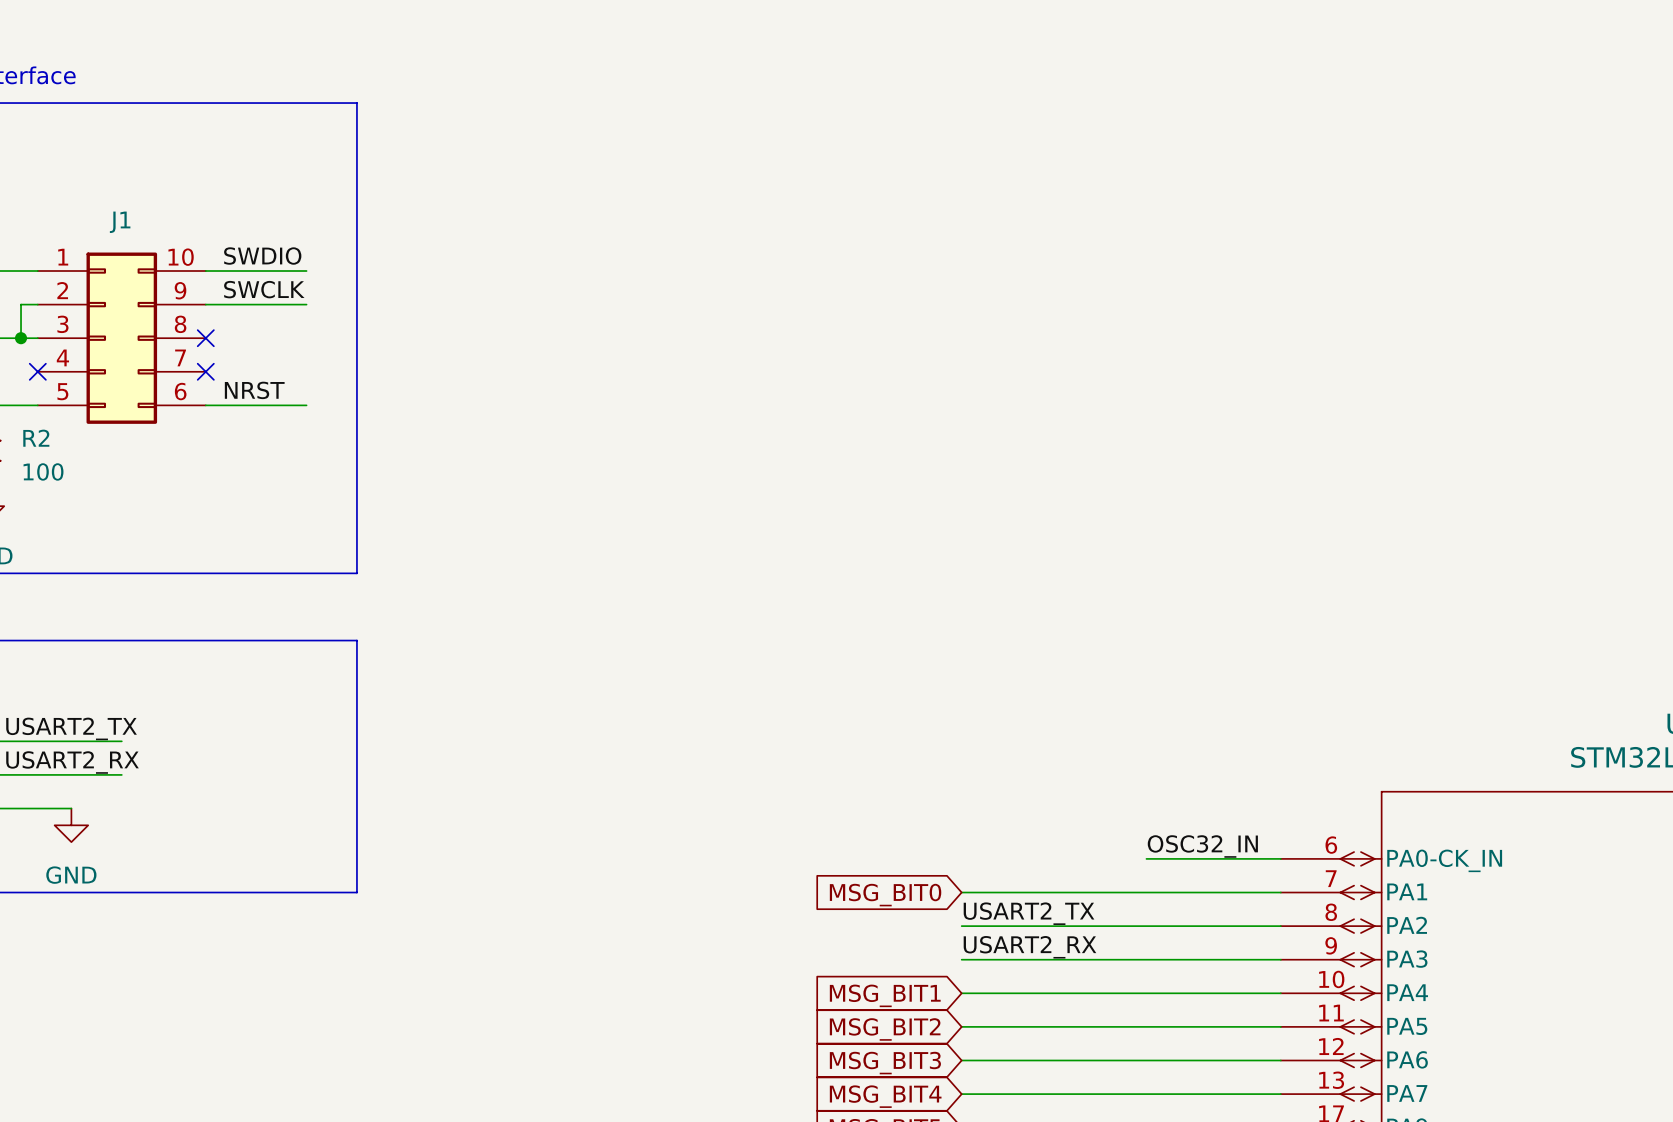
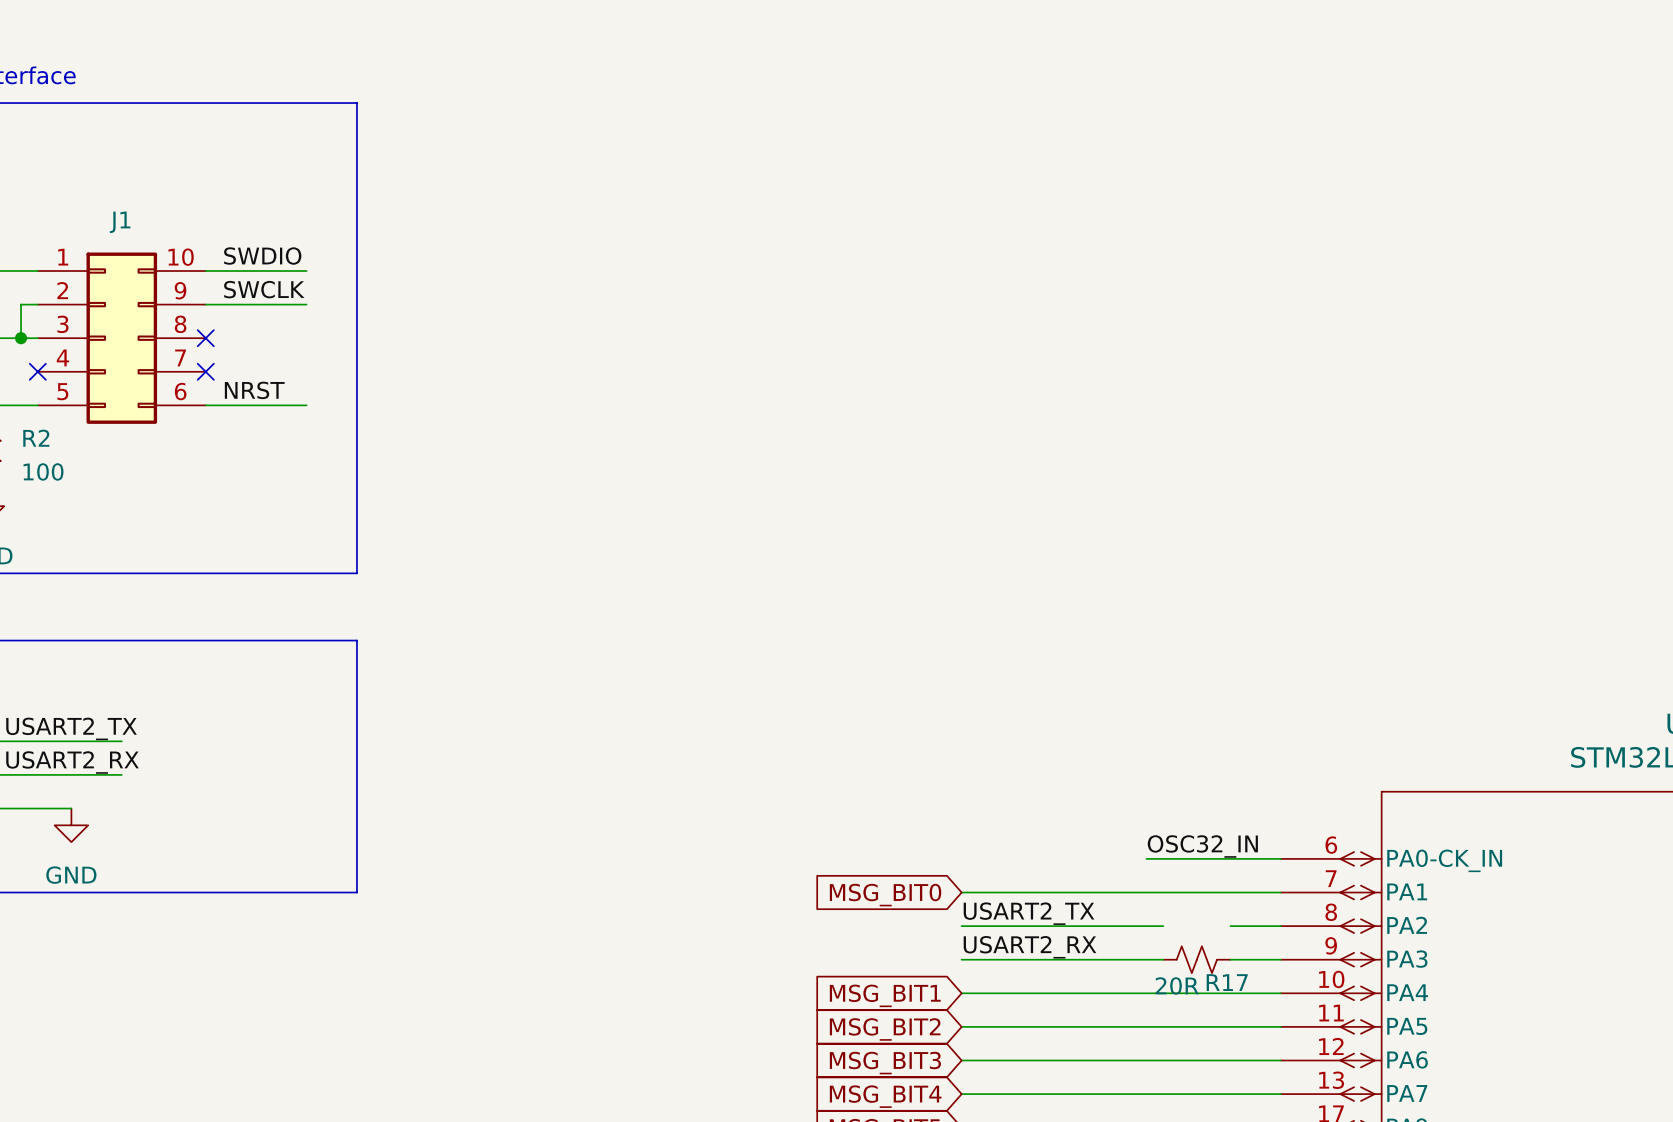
wire: (1163, 926) (1230, 926) -> none
R17: none -> 20R (1196, 959)

